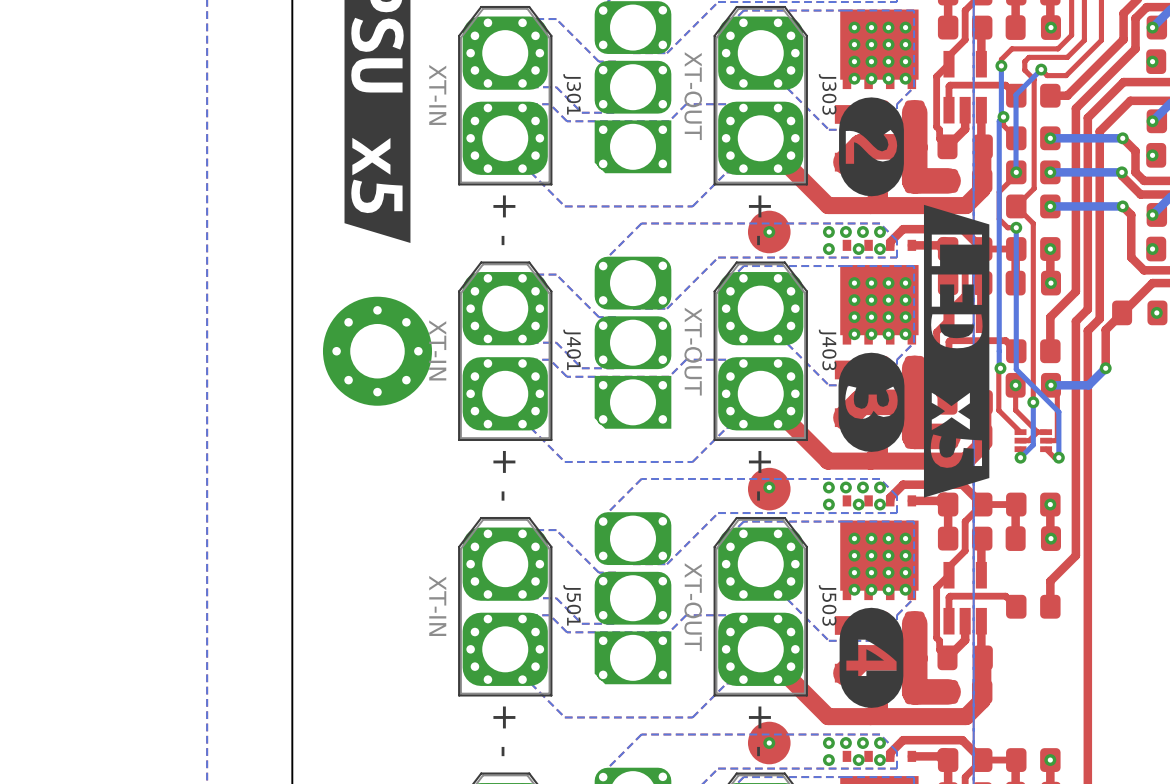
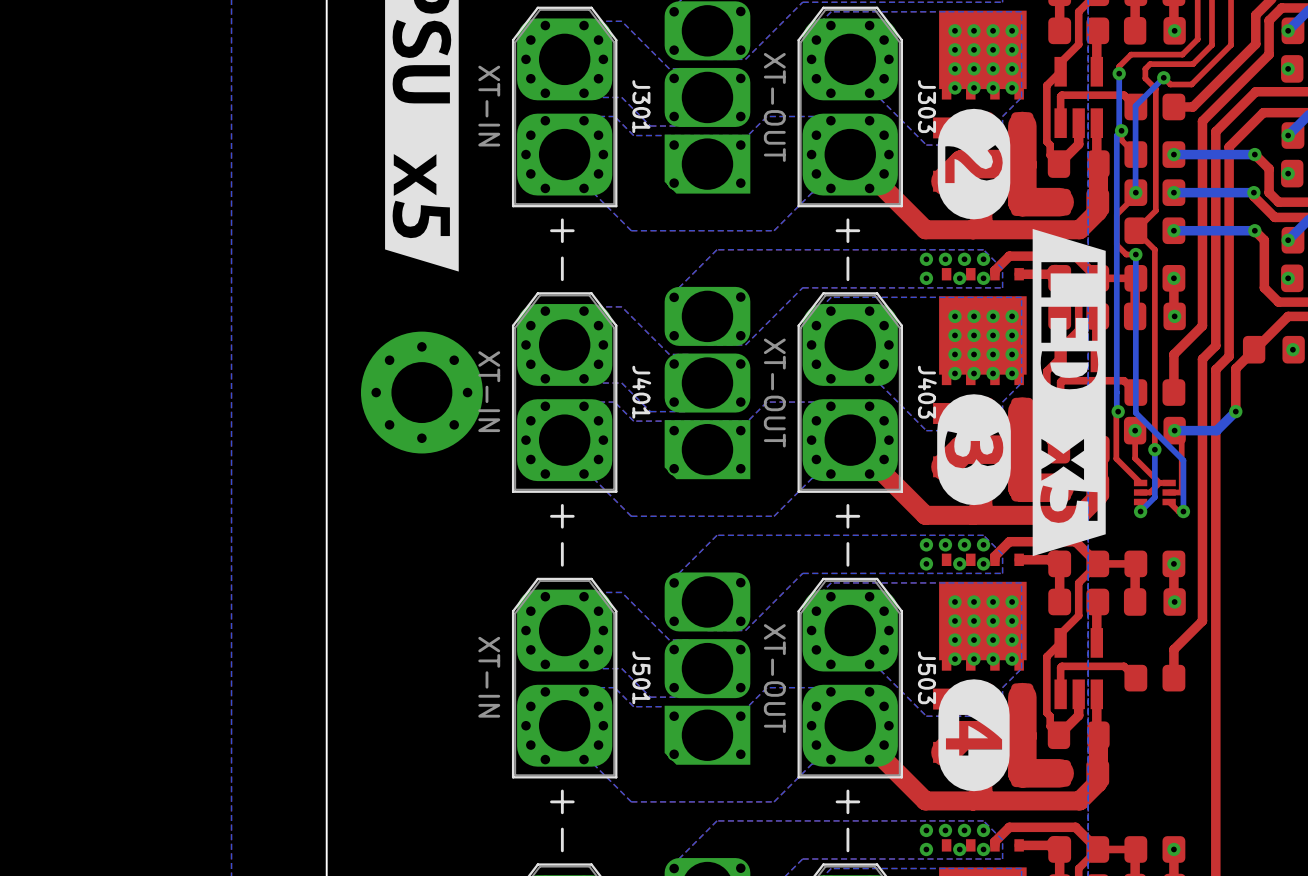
part: (769, 231) -> none
via: (769, 231) -> none
via: (769, 487) -> none
part: (769, 489) -> none
part: (769, 743) -> none
via: (769, 743) -> none

